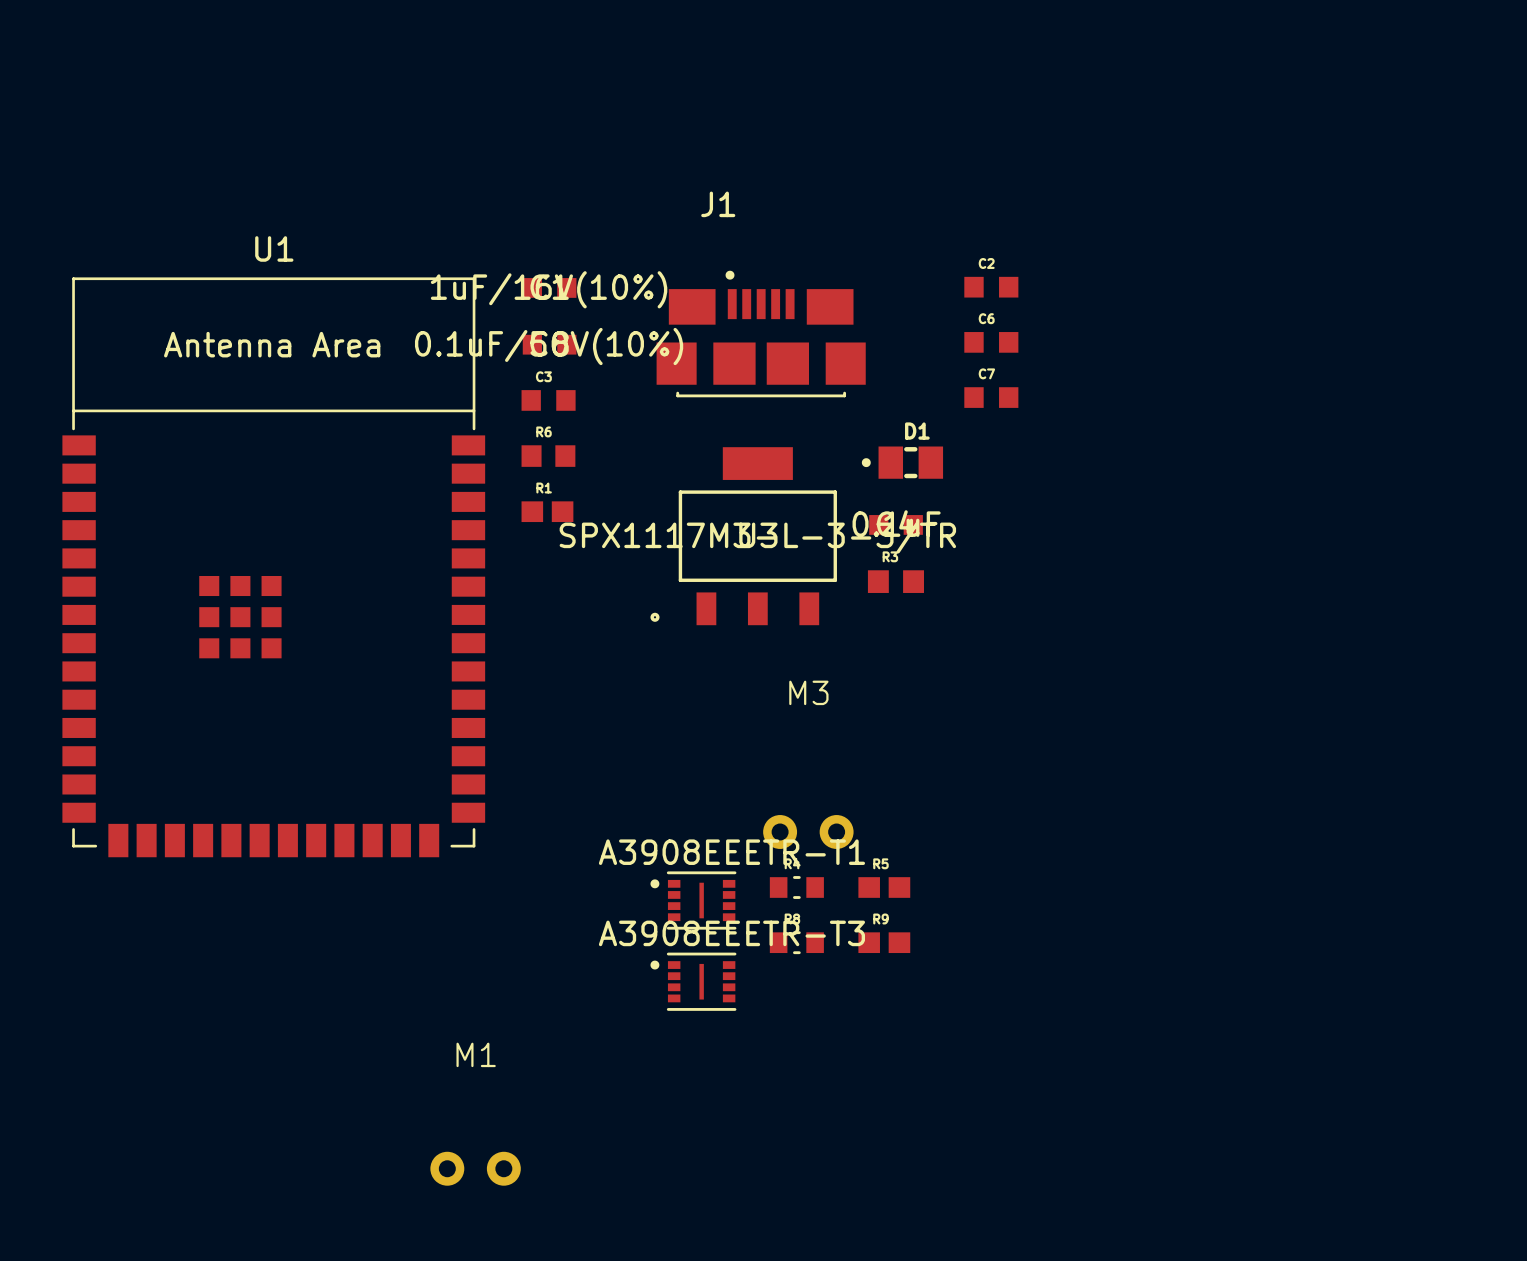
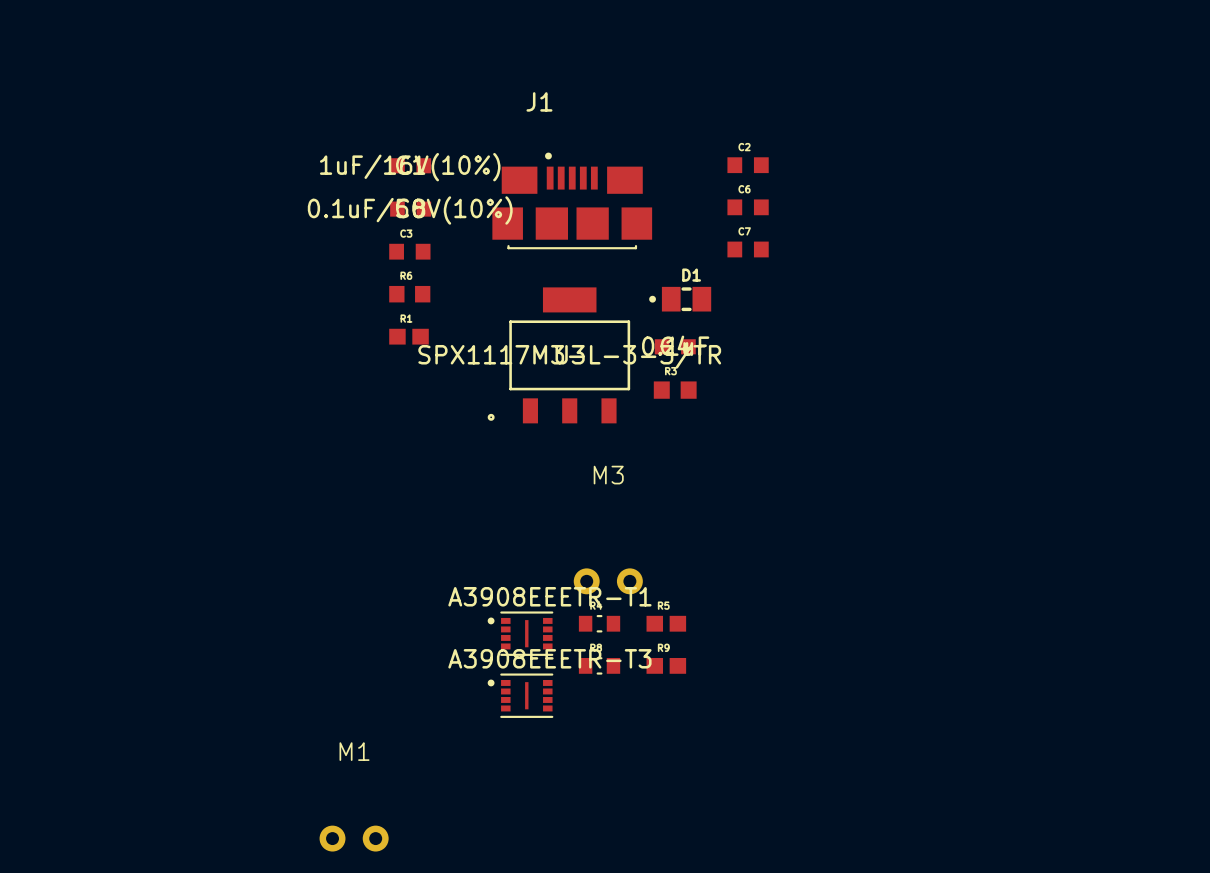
U1: (273, 567) -> none

